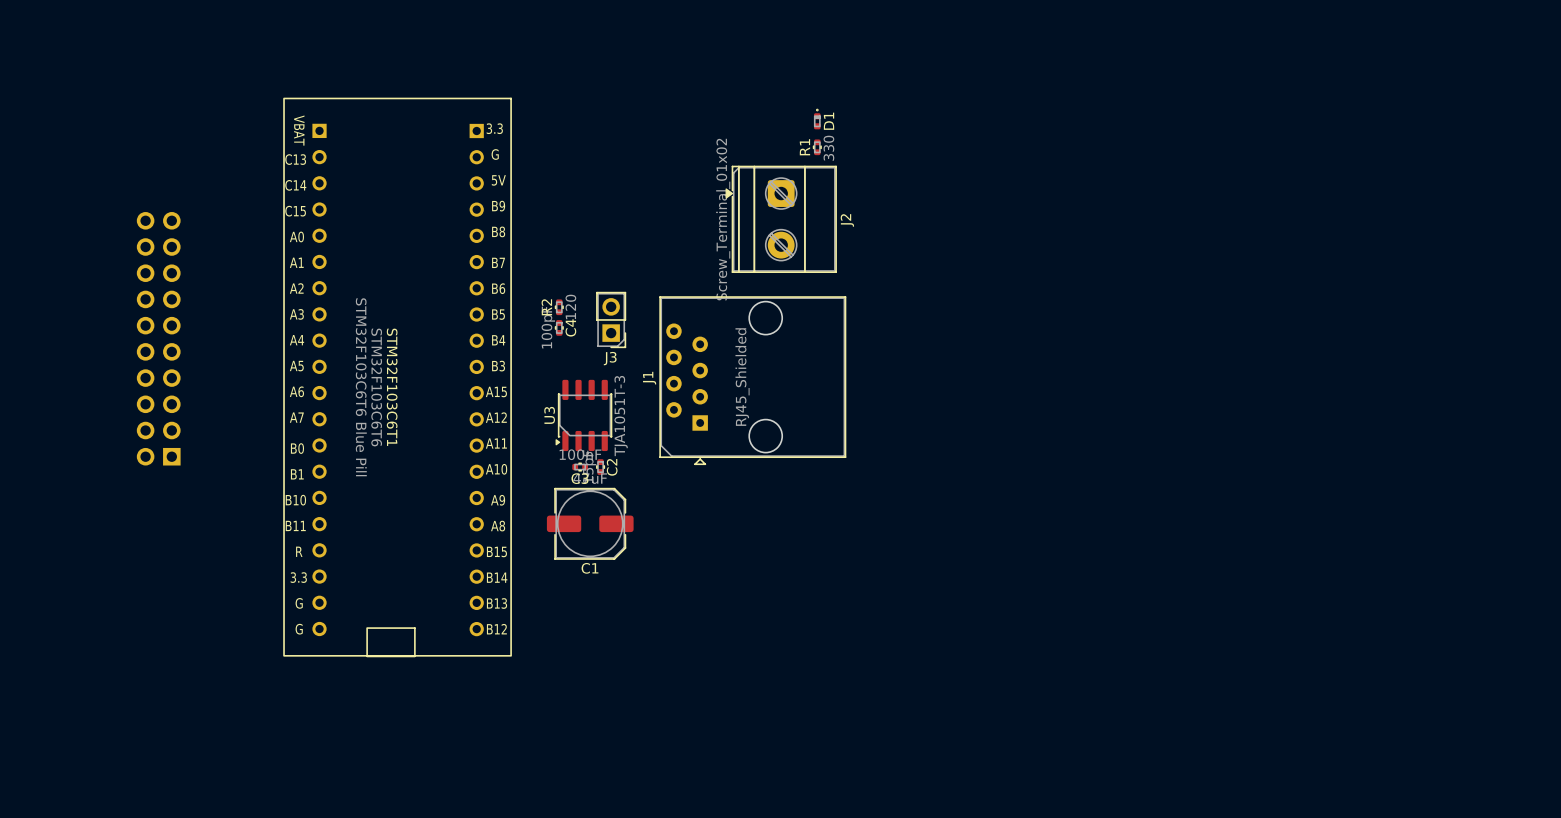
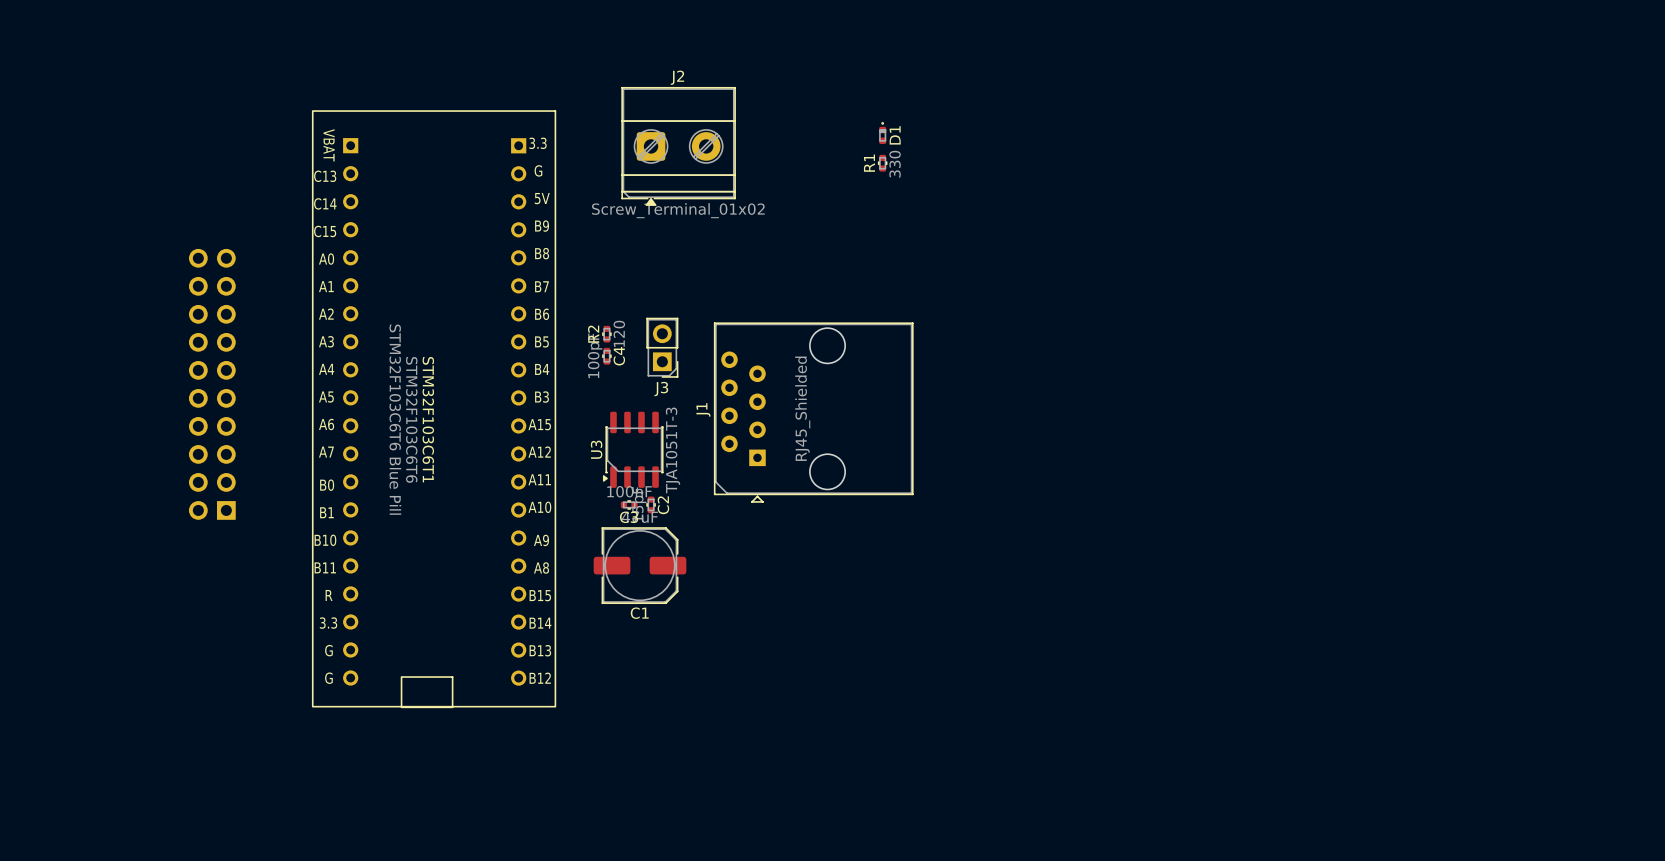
J2 rotation: 0° (781, 219) -> 90° counterclockwise (678, 146)
J2 position: (781, 219) -> (678, 146)
part position: (158, 338) -> (212, 384)

